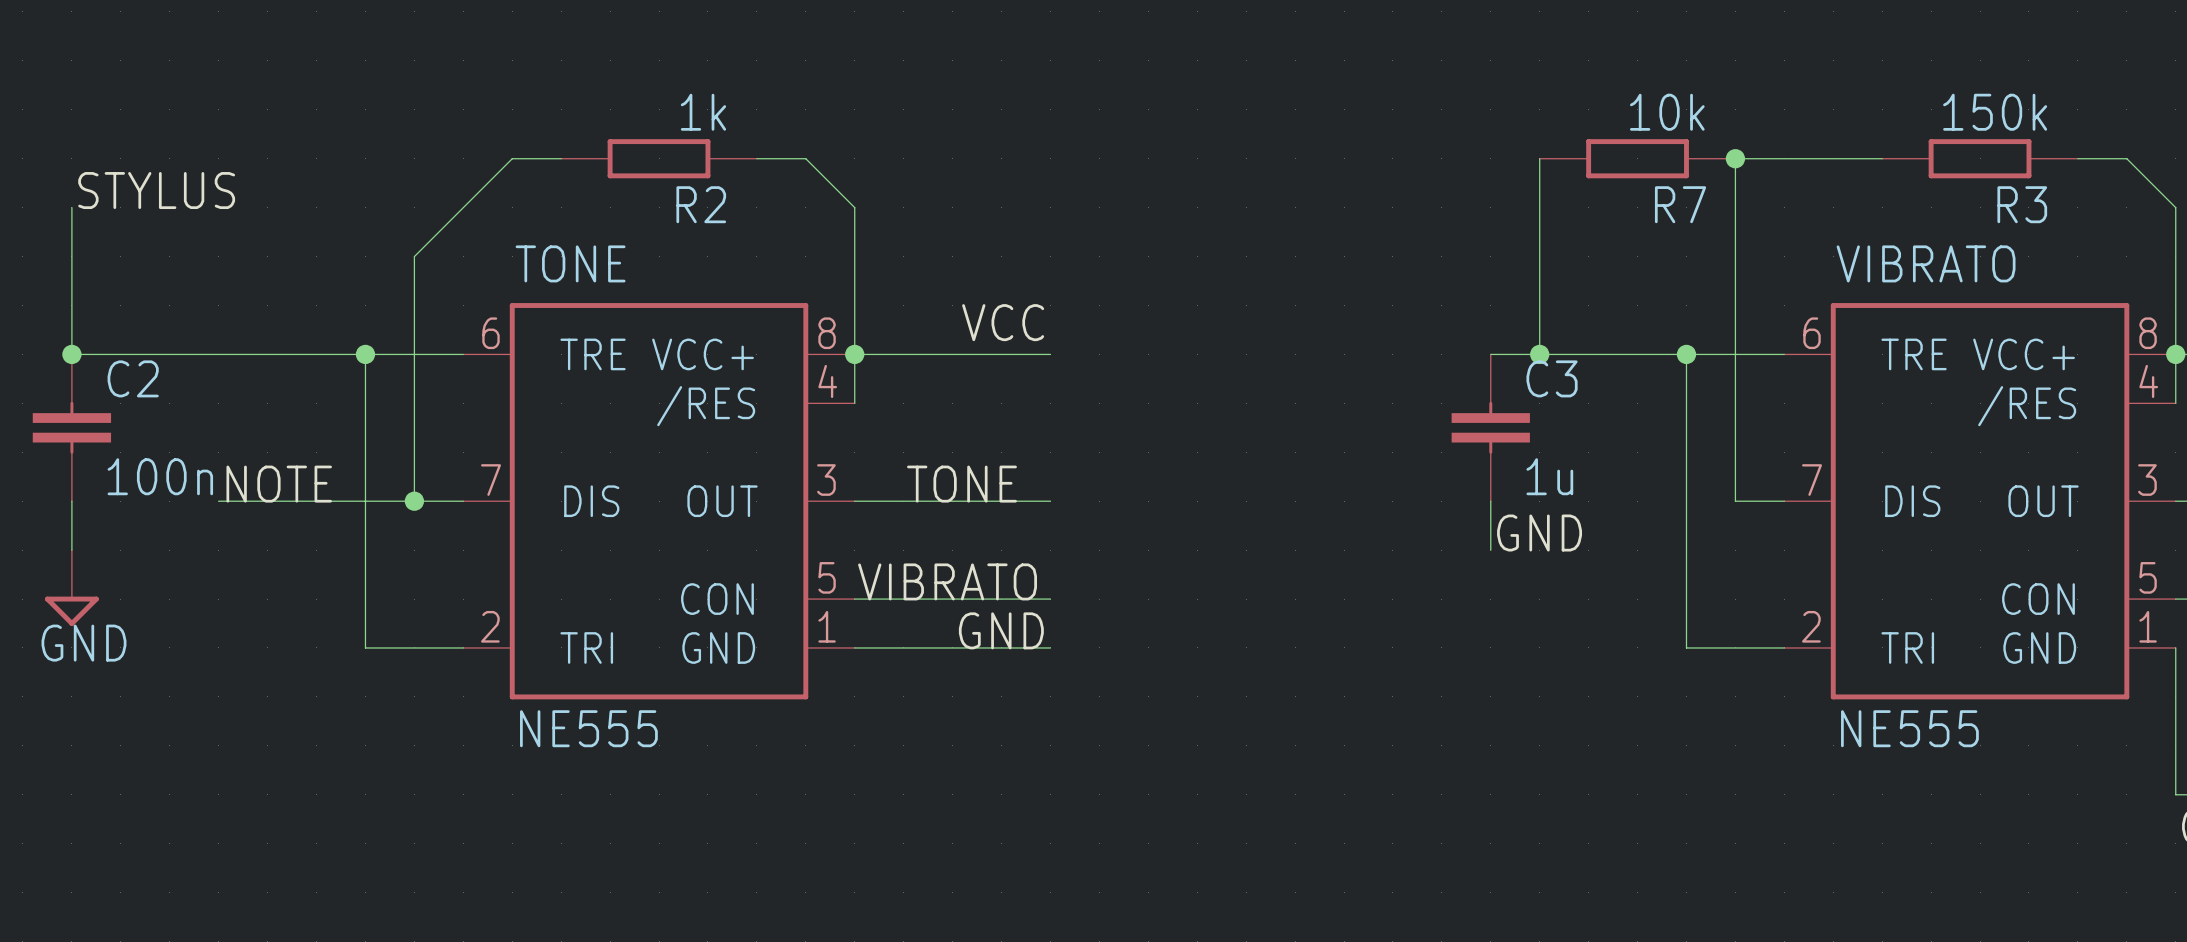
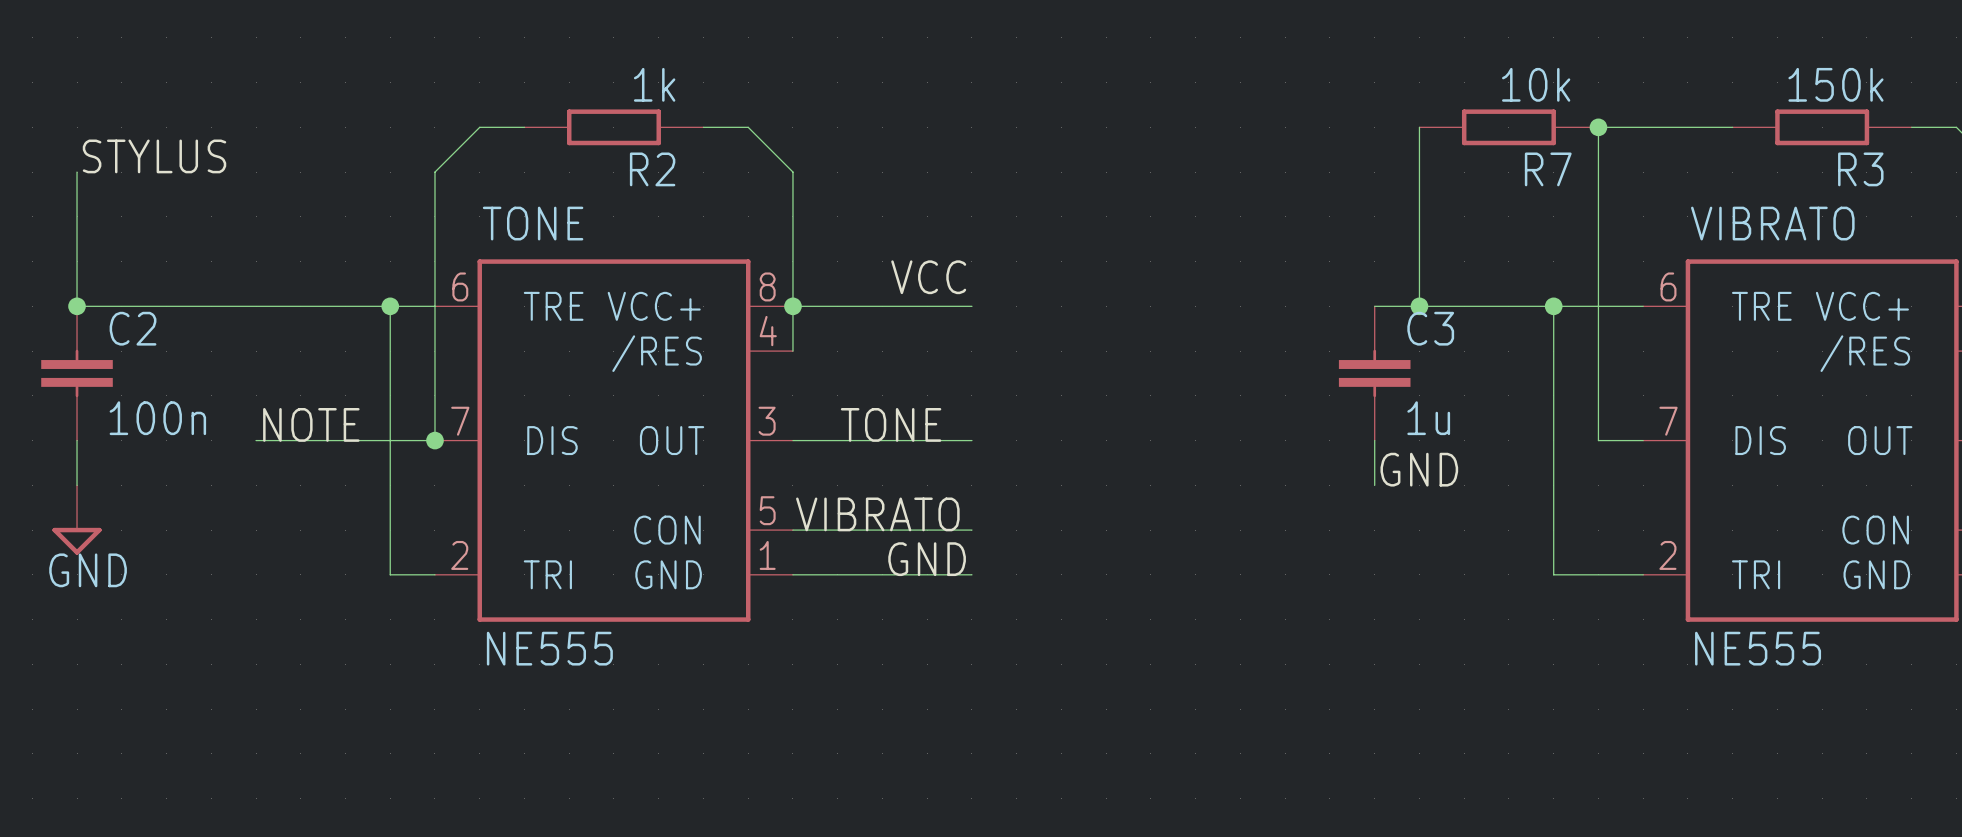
wire: (463, 207) (414, 256) (414, 354) -> (434, 172) (434, 440)
wire: (365, 354) (365, 647) (414, 647) -> (390, 440) (390, 574)
junction position: (365, 354) -> (390, 306)
label position: NOTE (279, 484) -> NOTE (311, 424)
wire: (218, 501) (267, 501) -> none
junction position: (414, 501) -> (434, 440)

